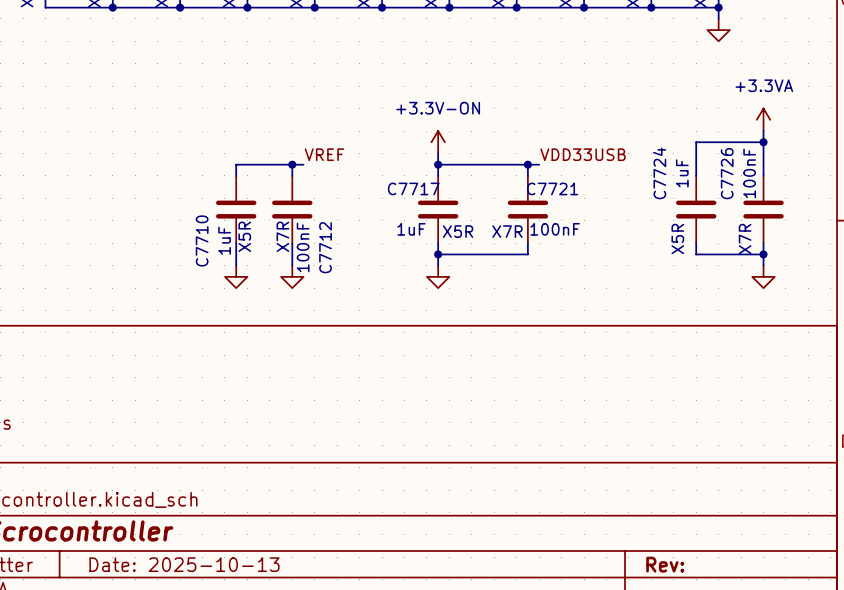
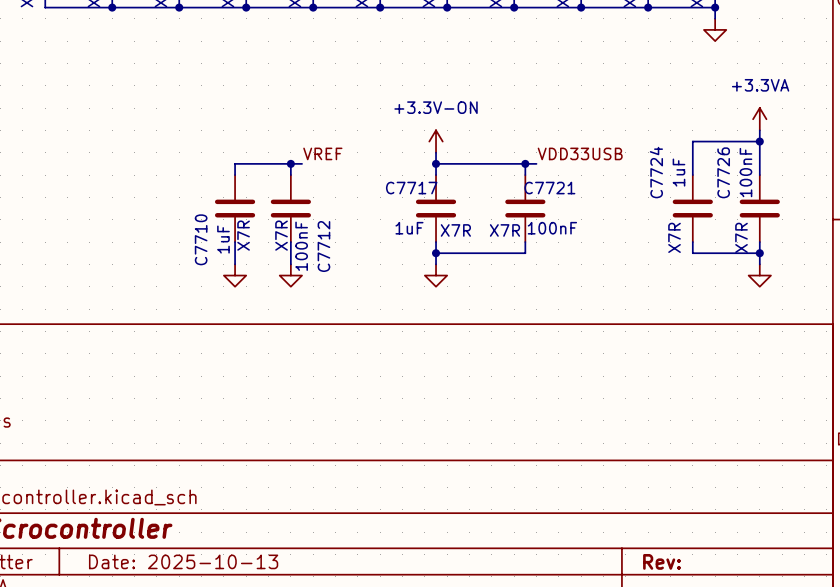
C7717 text: X5R (458, 231) -> X7R (455, 230)
C7710 text: X5R (244, 236) -> X7R (243, 235)
C7724 text: X5R (677, 239) -> X7R (674, 237)

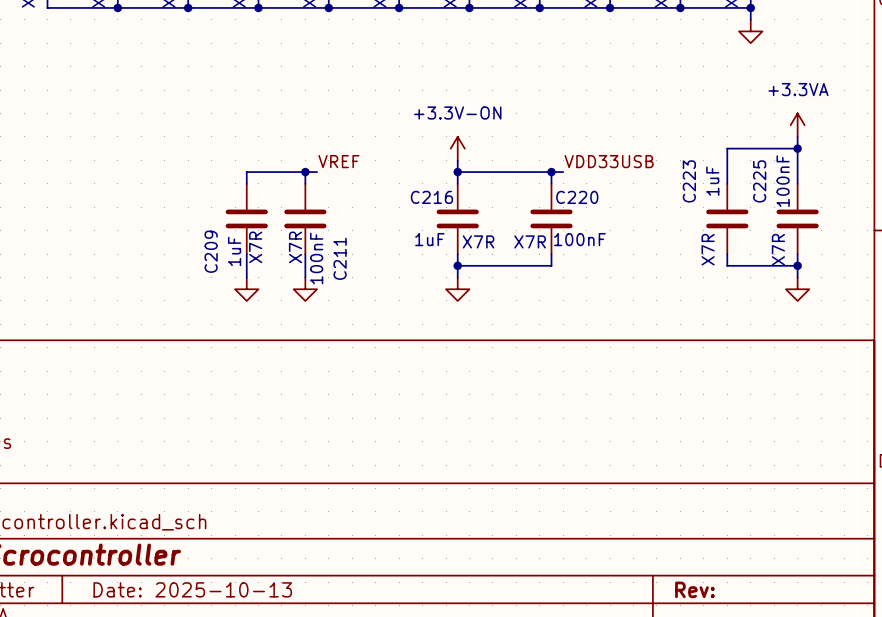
C7724 name: C7724 (656, 172) -> C223 (689, 181)
C7726 name: C7726 (723, 172) -> C225 (759, 181)
C7717 name: C7717 (411, 188) -> C216 (431, 197)
C7721 name: C7721 (549, 188) -> C220 (577, 197)
C7710 name: C7710 (201, 239) -> C209 (211, 251)
C7712 name: C7712 (323, 246) -> C211 (340, 258)

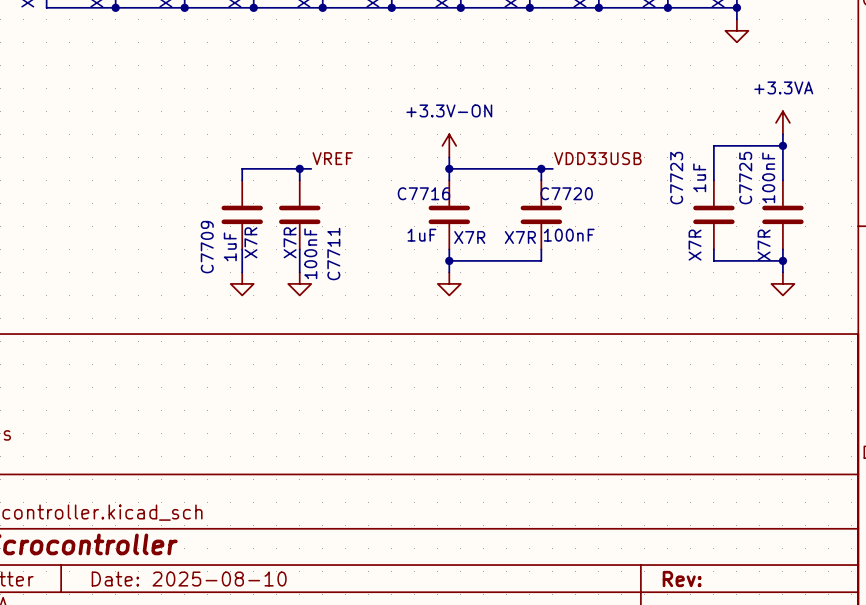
C223 name: C223 (689, 181) -> C7723 (676, 178)
C225 name: C225 (759, 181) -> C7725 (745, 178)
C216 name: C216 (431, 197) -> C7716 (423, 193)
C220 name: C220 (577, 197) -> C7720 (566, 193)
C209 name: C209 (211, 251) -> C7709 (207, 247)
C211 name: C211 (340, 258) -> C7711 (333, 254)
title block: Date: 2025-10-13 (192, 589) -> Date: 2025-08-10 (189, 579)

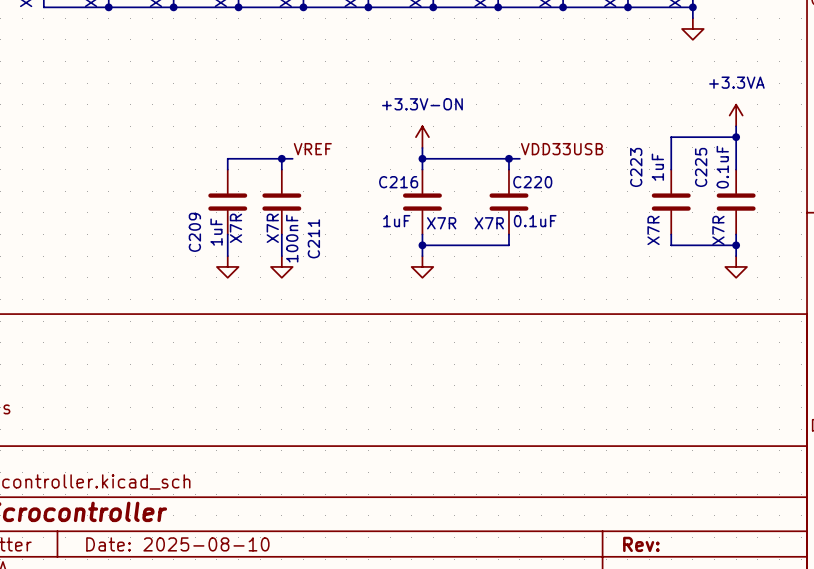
C7725 value: 100nF (768, 177) -> 0.1uF (722, 167)
C7723 name: C7723 (676, 178) -> C223 (636, 167)
C7725 name: C7725 (745, 178) -> C225 (701, 167)
C7716 name: C7716 (423, 193) -> C216 (398, 182)
C7720 name: C7720 (566, 193) -> C220 (532, 182)
C7720 value: 100nF (569, 235) -> 0.1uF (535, 221)
C7709 name: C7709 (207, 247) -> C209 (194, 232)
C7711 name: C7711 (333, 254) -> C211 (313, 238)

